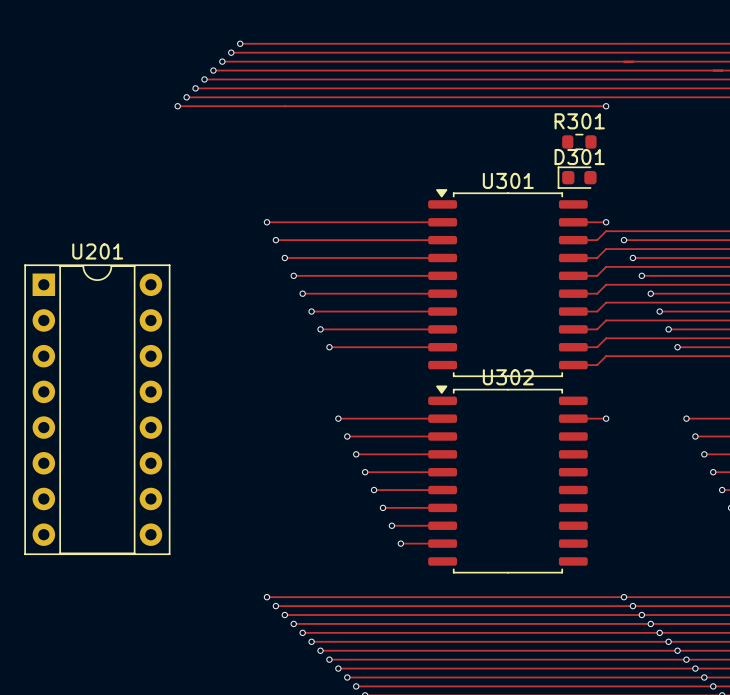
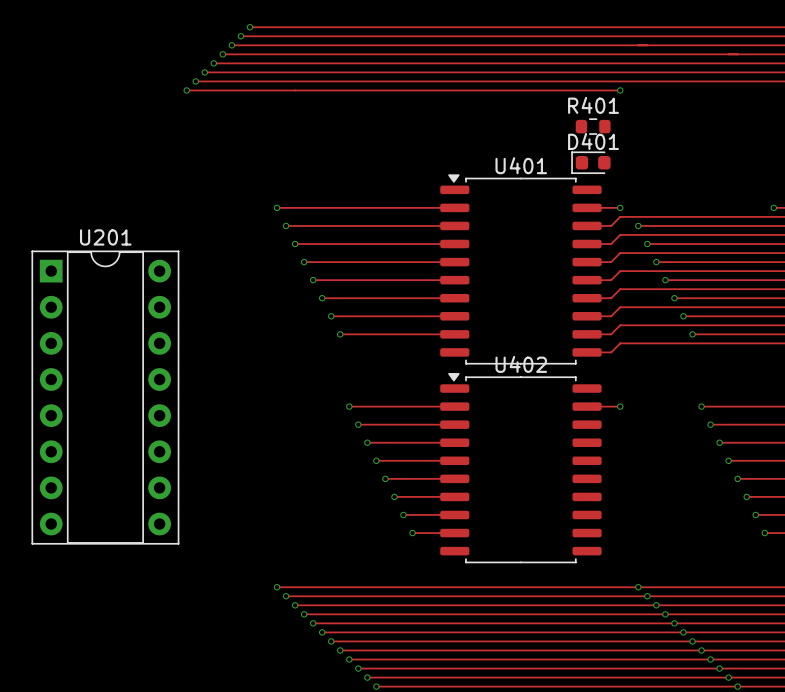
R301 name: R301 (579, 121) -> R401 (593, 105)
D301 name: D301 (579, 157) -> D401 (593, 141)
U301 name: U301 (508, 180) -> U401 (521, 165)
U302 name: U302 (508, 377) -> U402 (521, 364)

